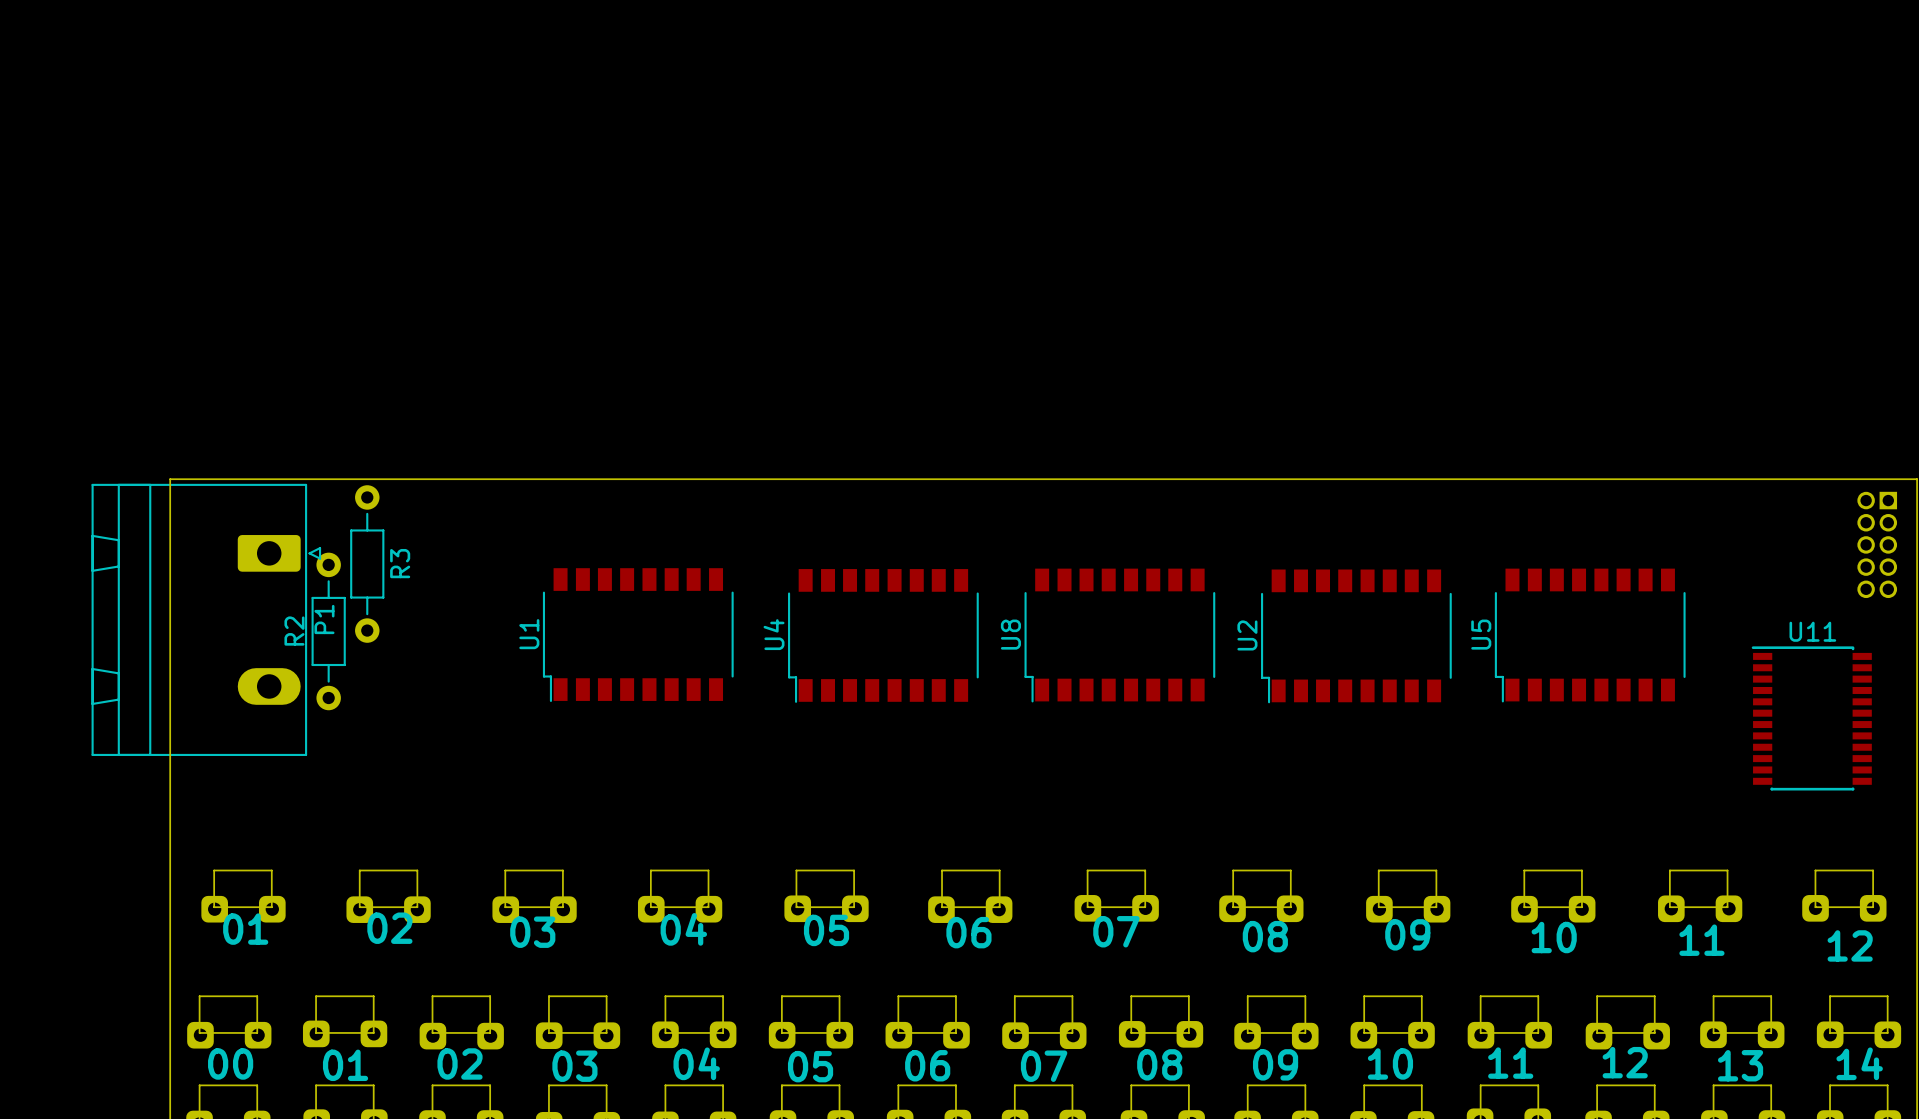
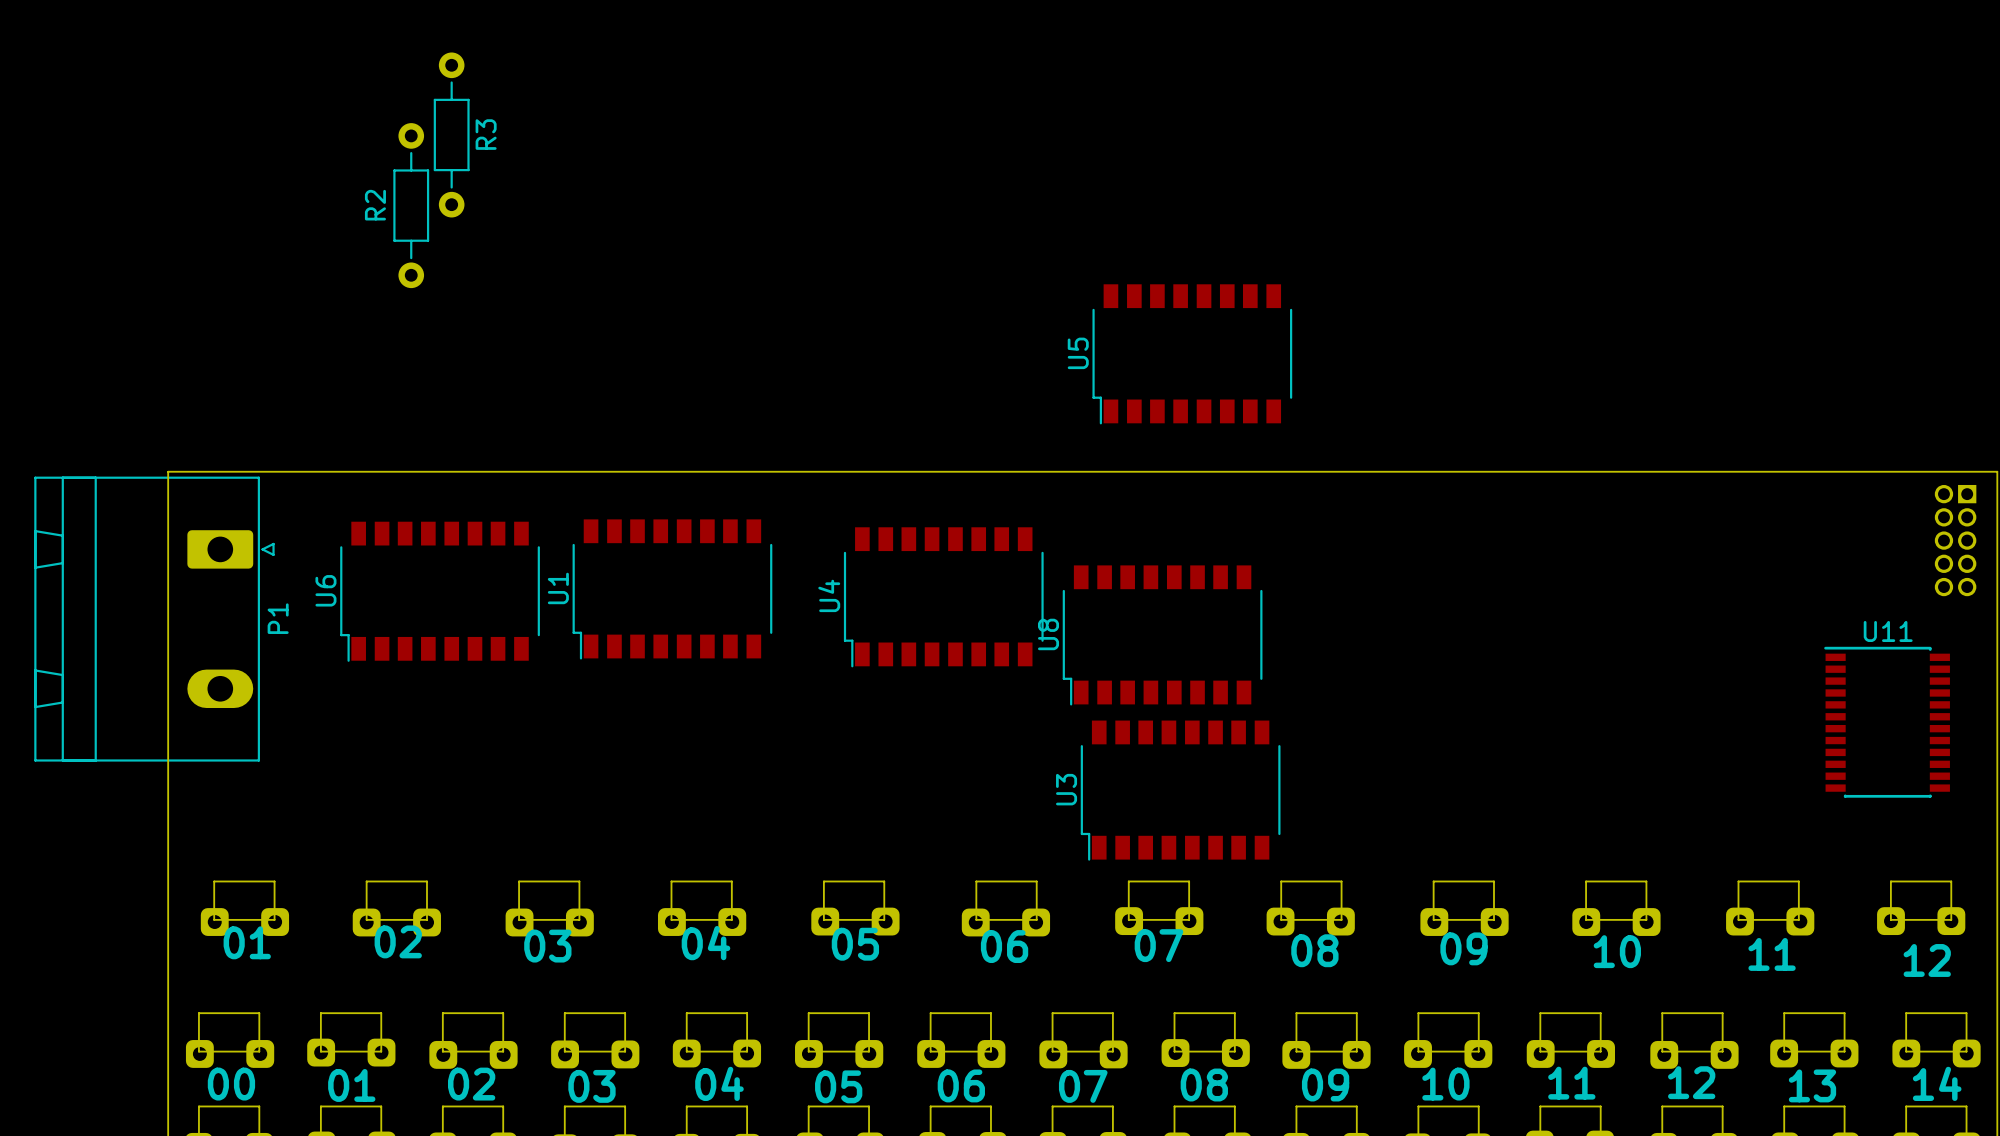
R3 position: (367, 564) -> (451, 134)
U6: none -> (440, 591)
P1 position: (206, 619) -> (154, 619)
R2 position: (328, 631) -> (411, 205)
U1 position: (638, 635) -> (672, 589)
U4 position: (883, 635) -> (943, 597)
U5 position: (1590, 635) -> (1192, 354)
U2: (1356, 636) -> none
U3: none -> (1180, 790)

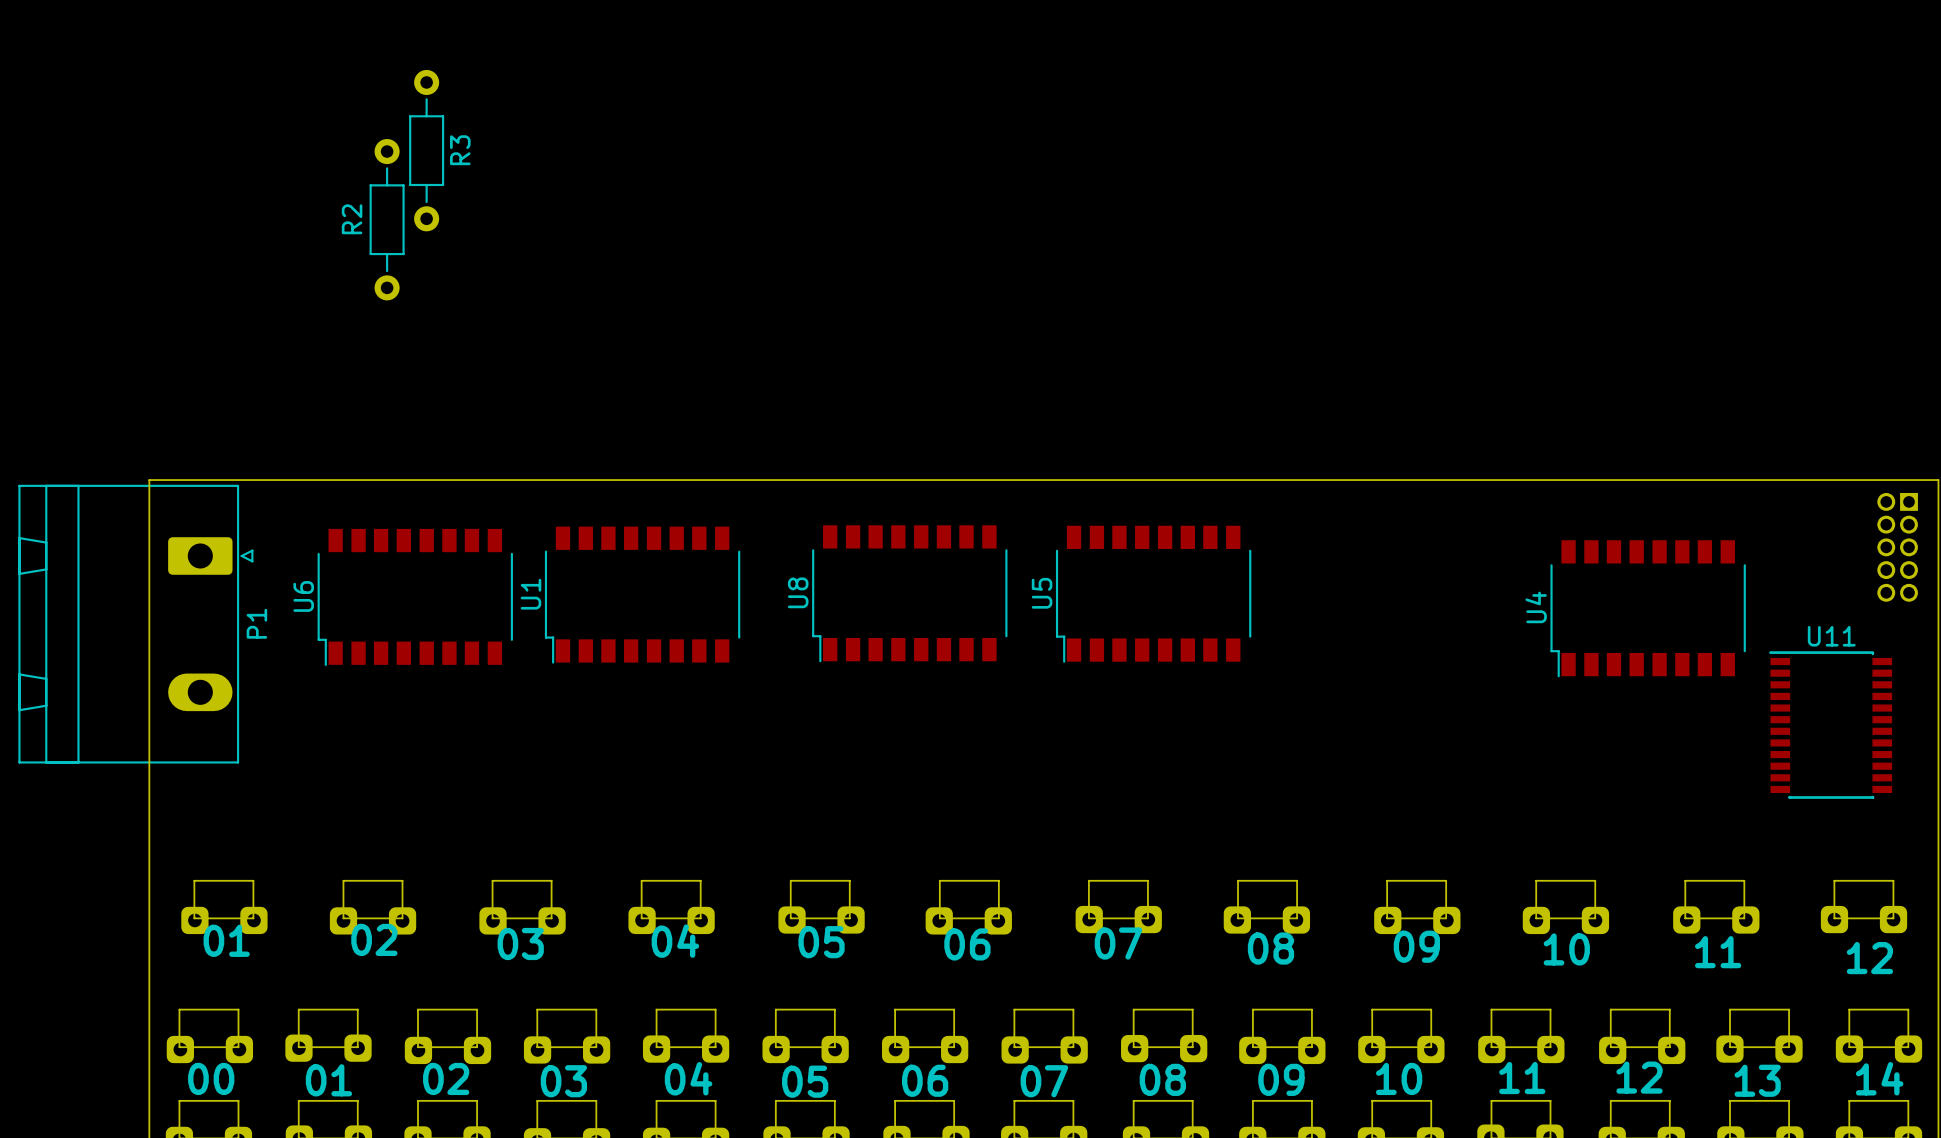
U5 position: (1192, 354) -> (1153, 594)
U4 position: (943, 597) -> (1648, 608)
U8 position: (1162, 635) -> (909, 593)
U3: (1180, 790) -> none

